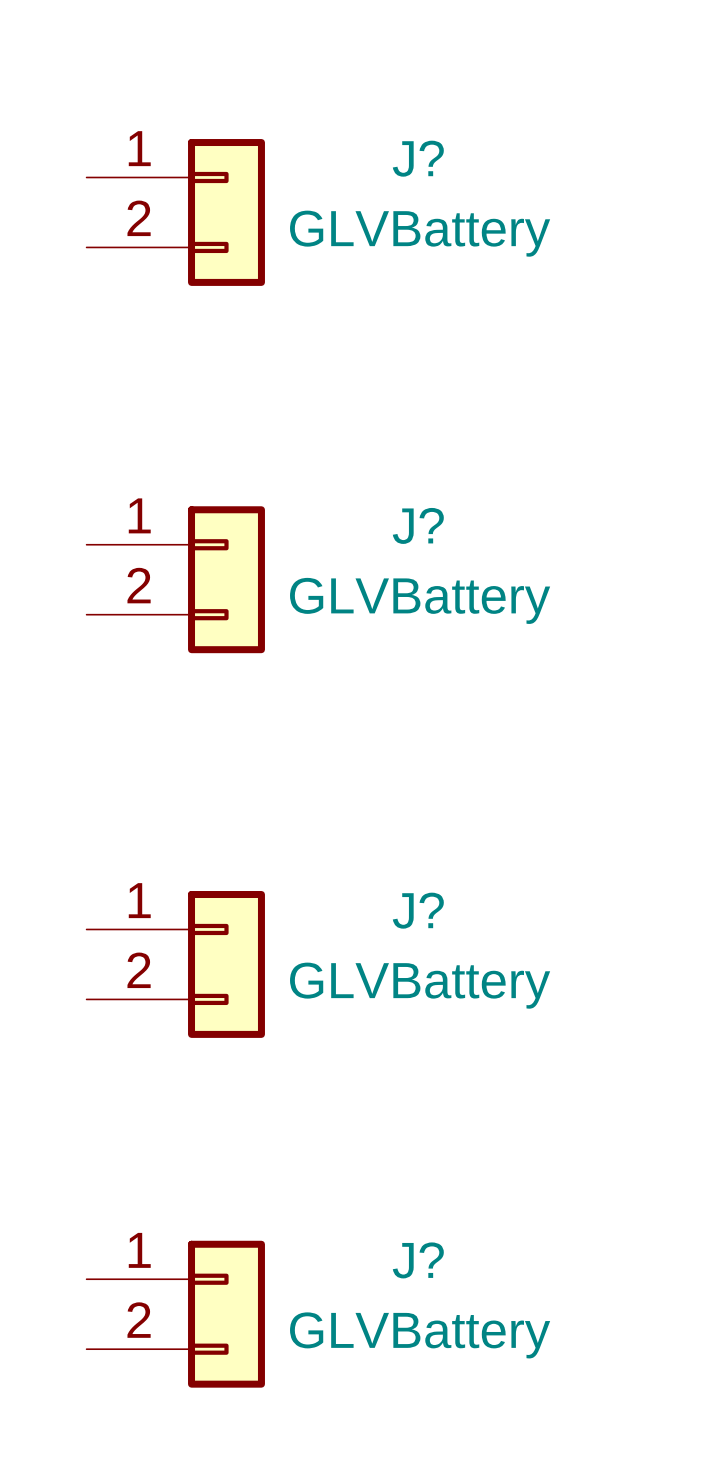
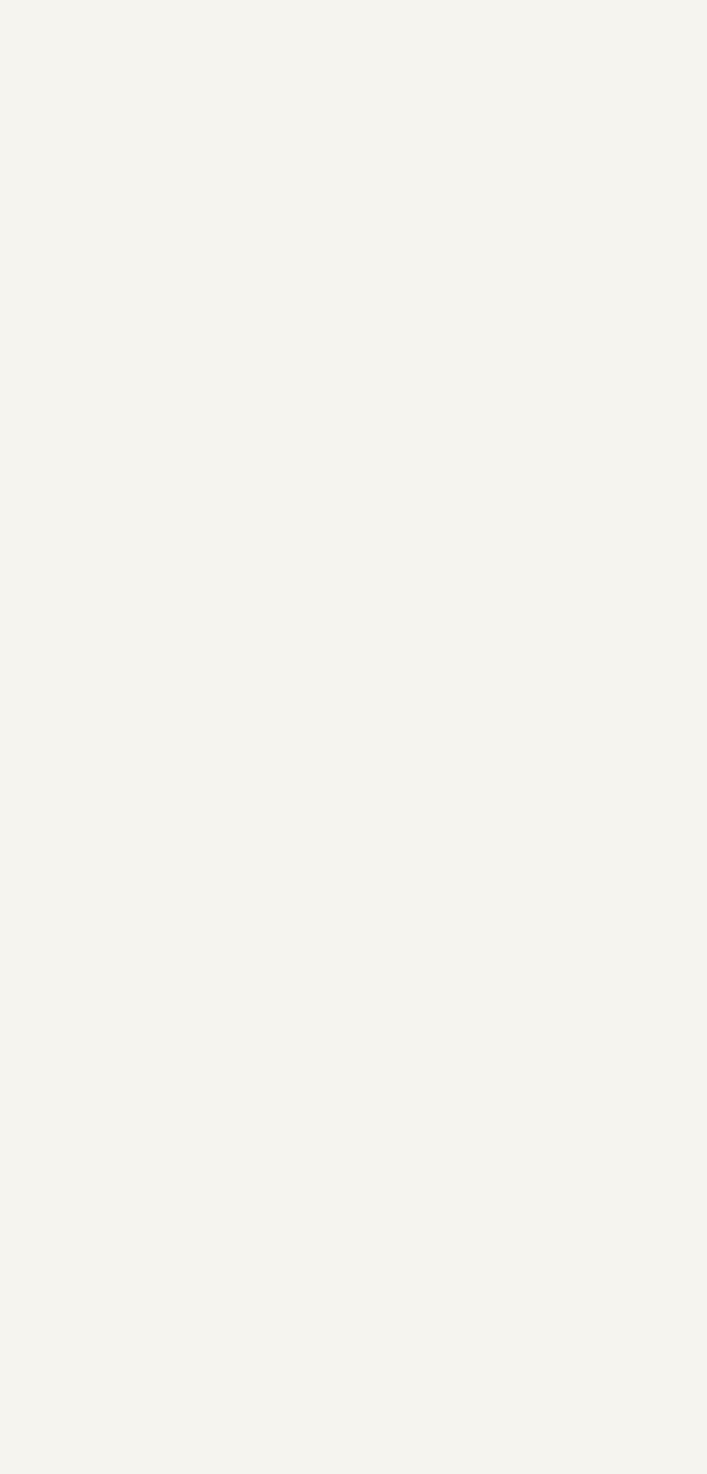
J?: GLVBattery (175, 212) -> none
J?: GLVBattery (175, 579) -> none
J?: GLVBattery (175, 964) -> none
J?: GLVBattery (175, 1314) -> none

